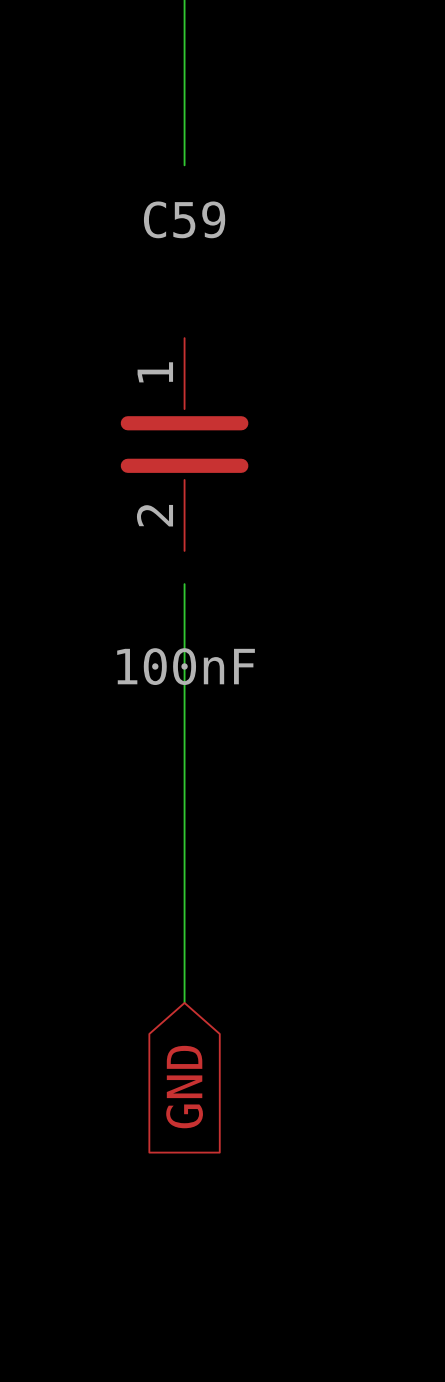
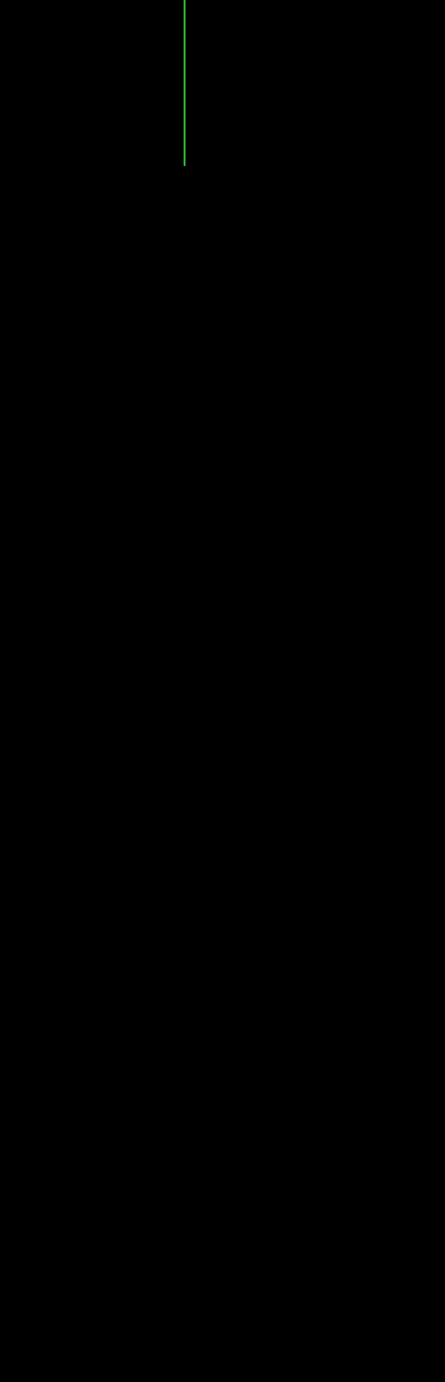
C59: 100nF (184, 444) -> none
wire: (184, 584) (184, 1002) -> none
global label: GND (184, 1087) -> none

